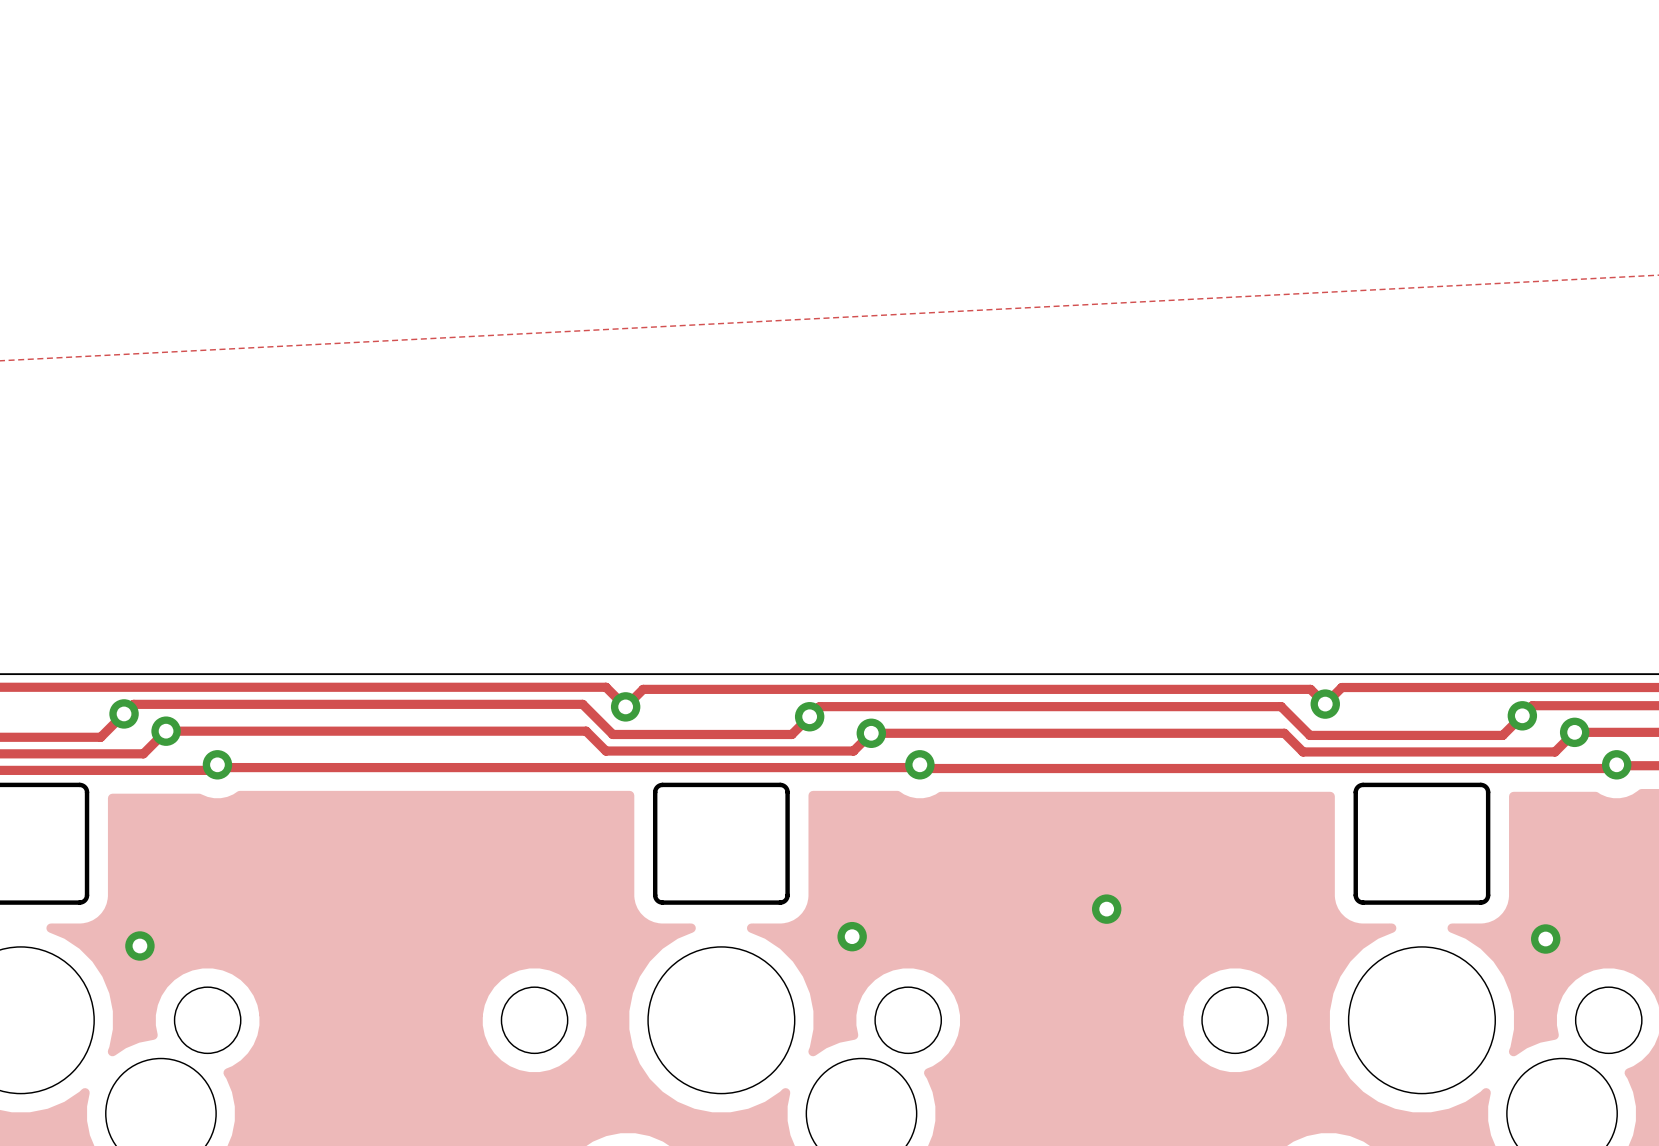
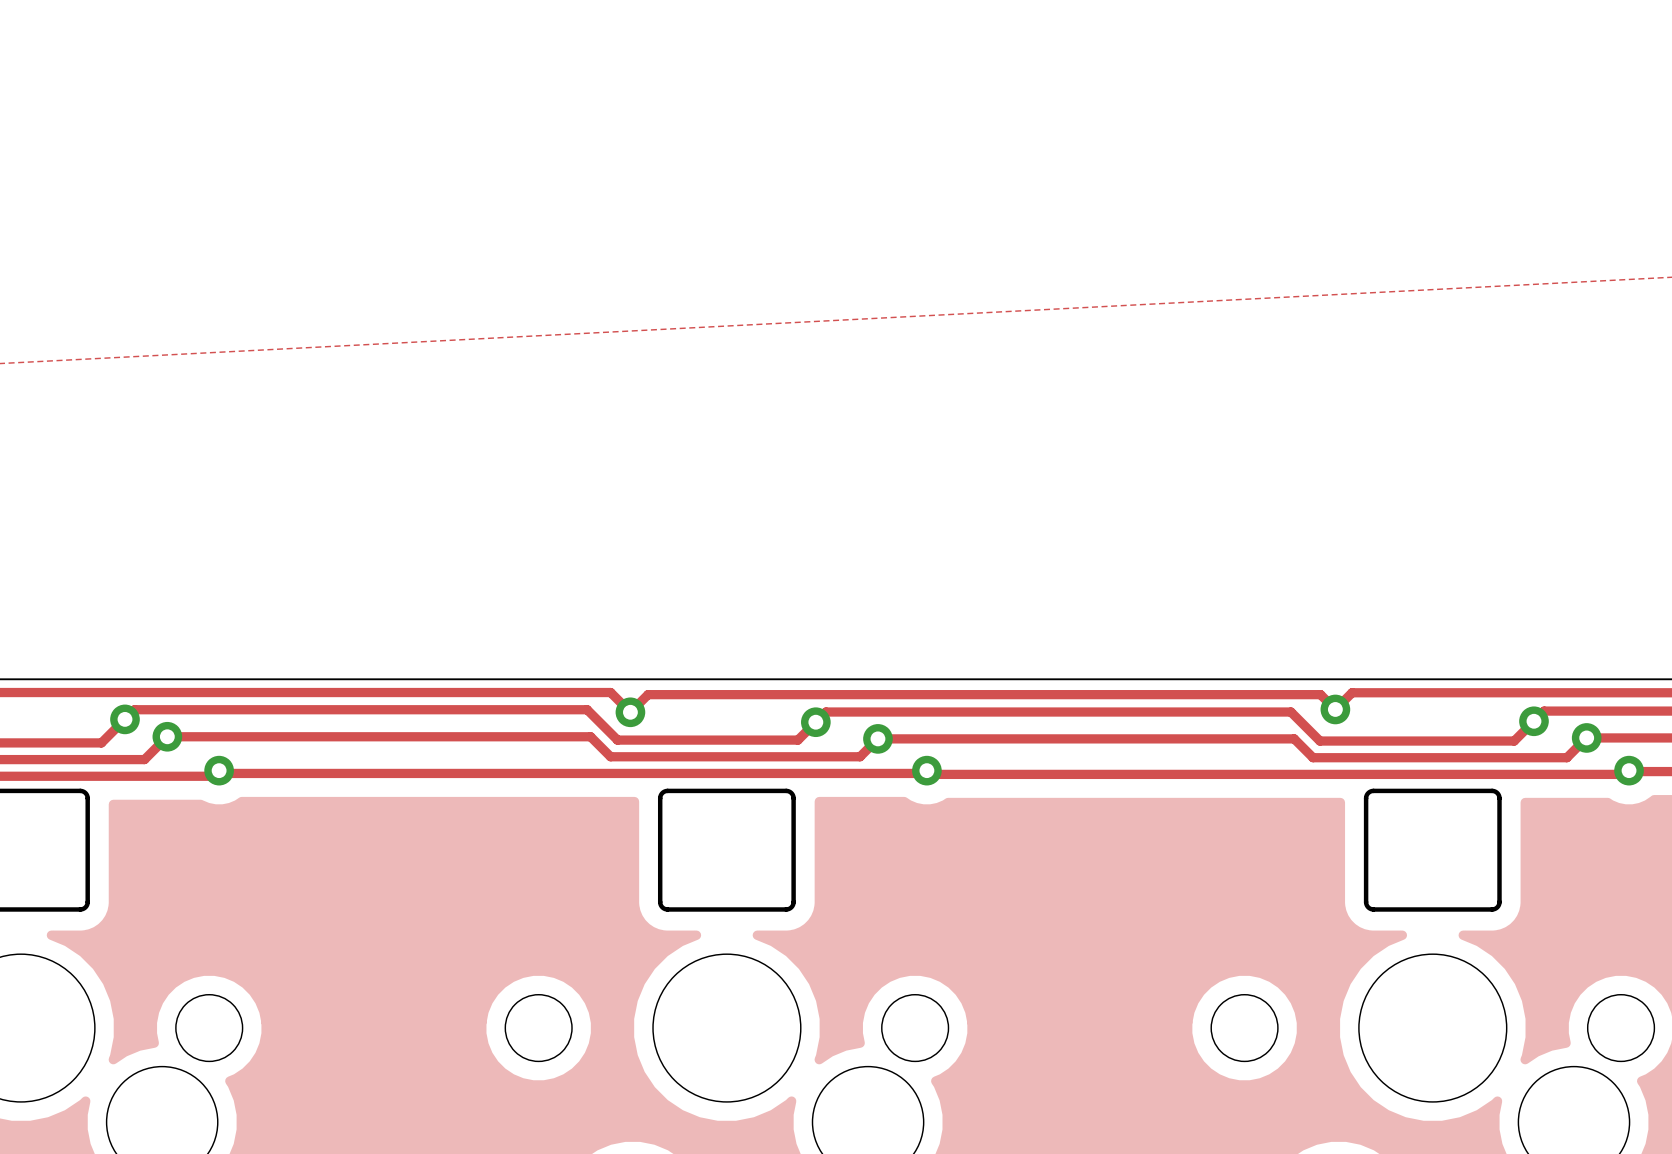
via: (1106, 909) -> none
via: (852, 936) -> none
via: (1545, 939) -> none
via: (139, 946) -> none

